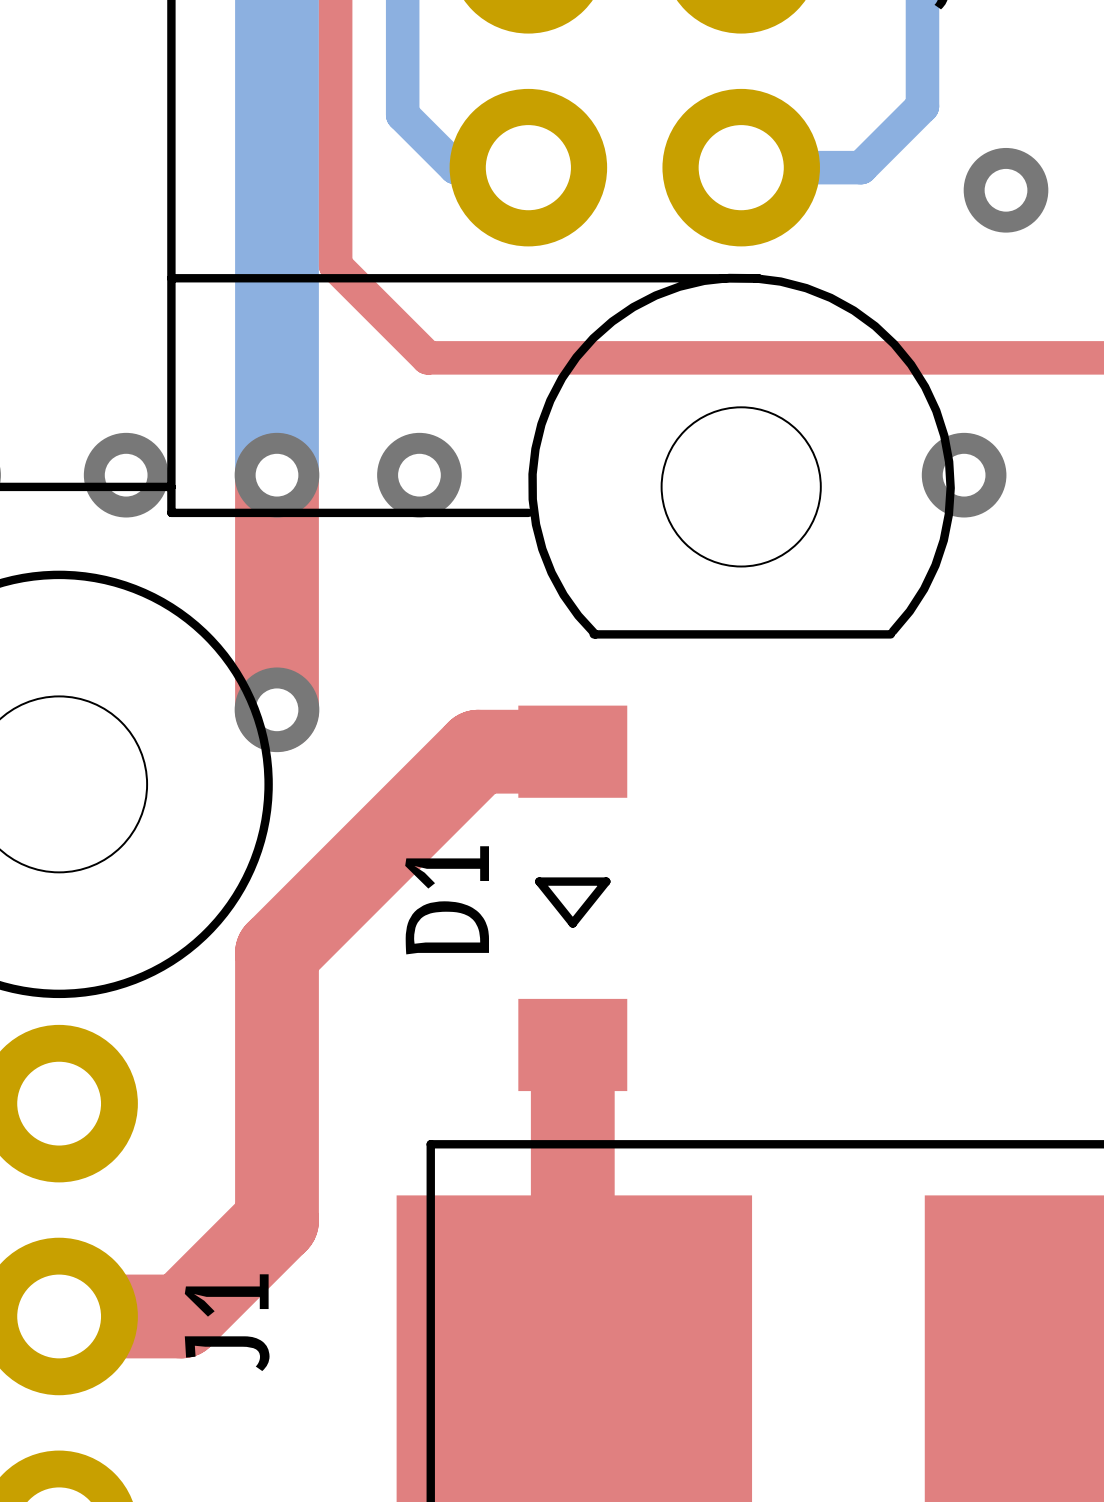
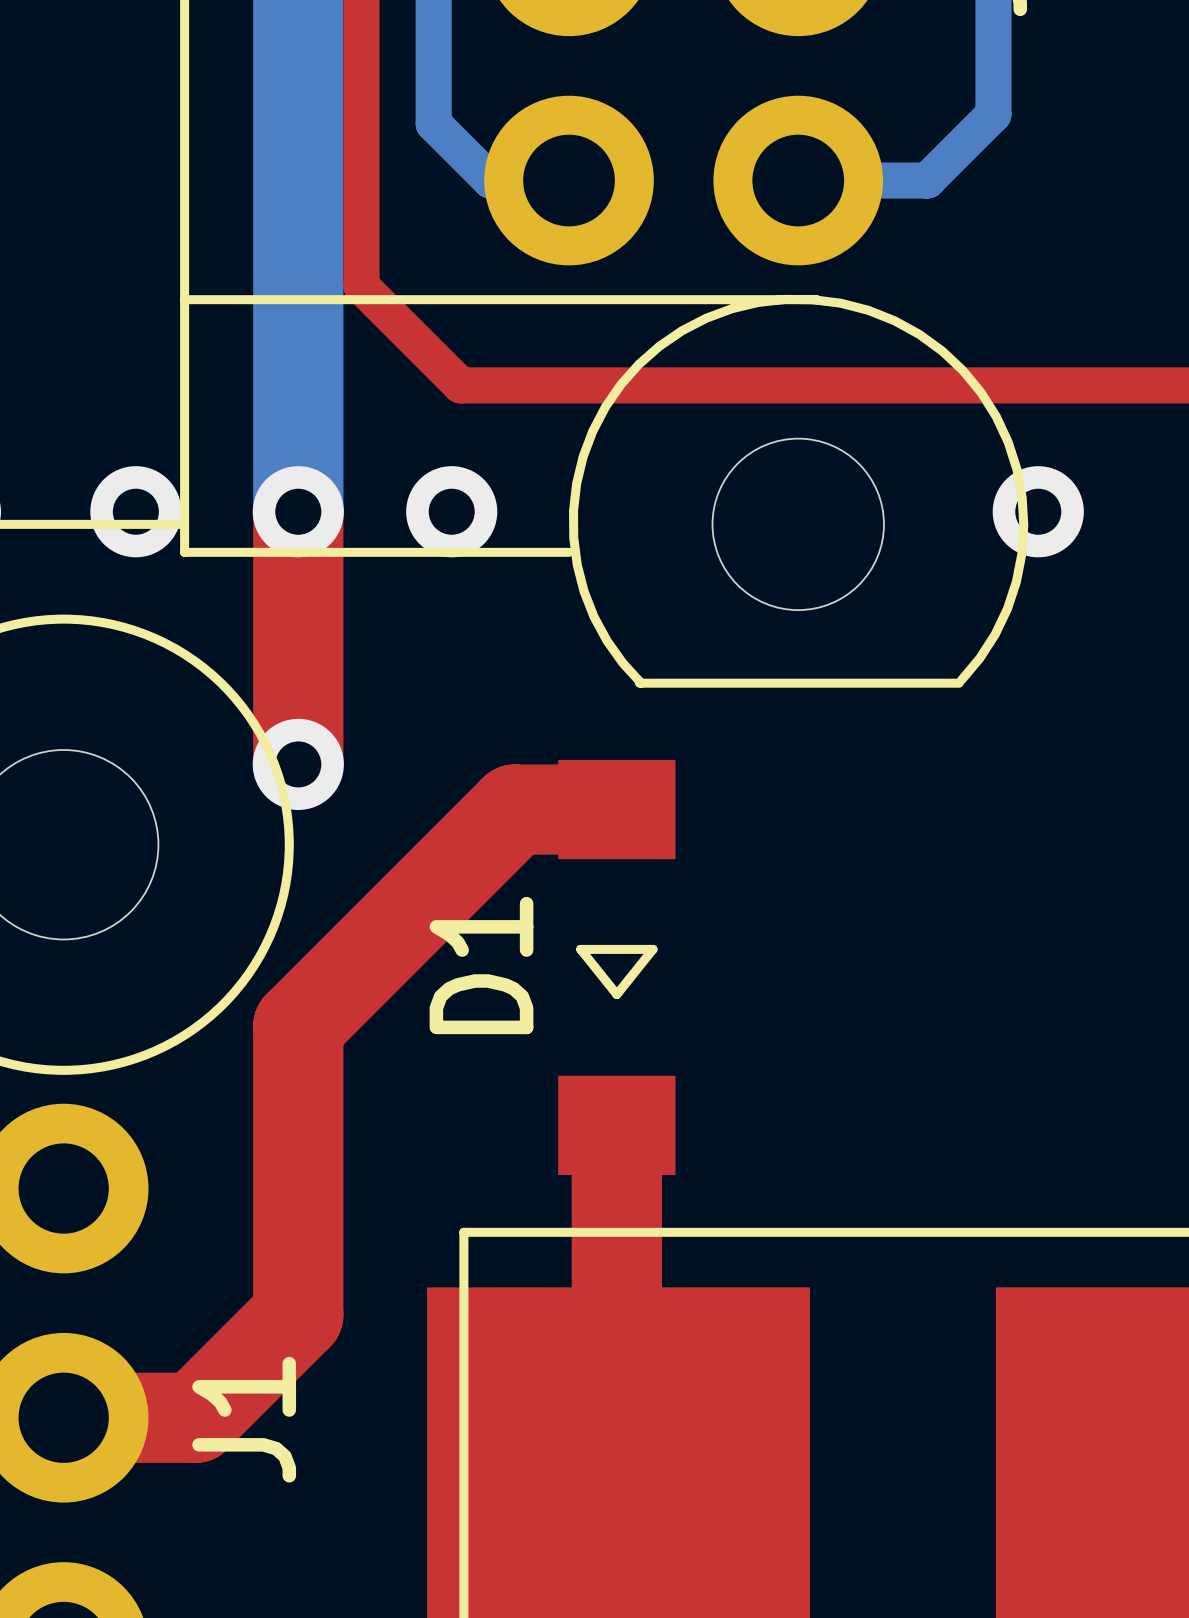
via: (1006, 190) -> none

